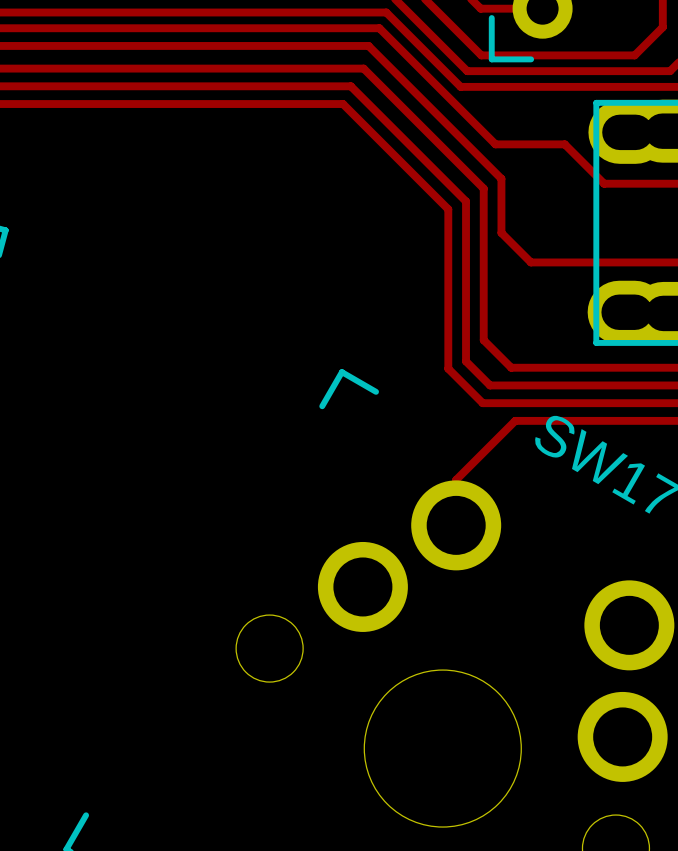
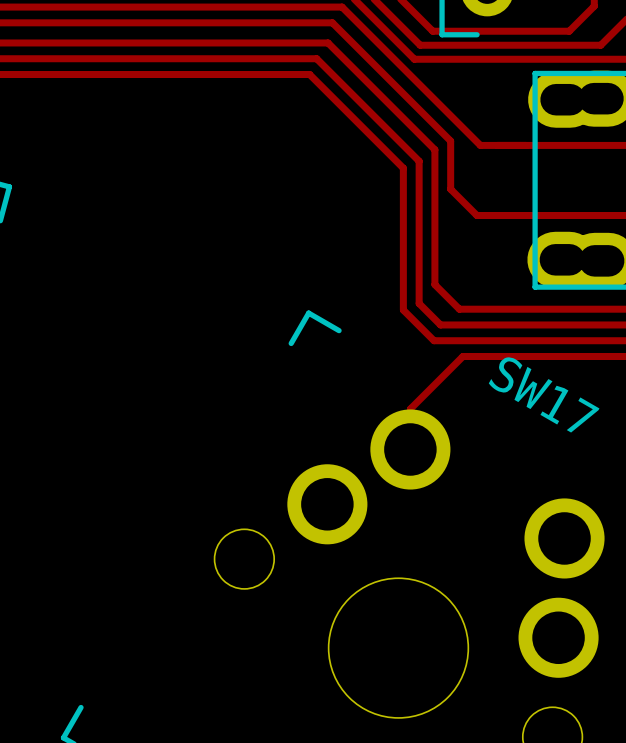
track: (495, 144) (564, 144) (604, 183) -> (445, 110) (480, 145) (542, 145)

